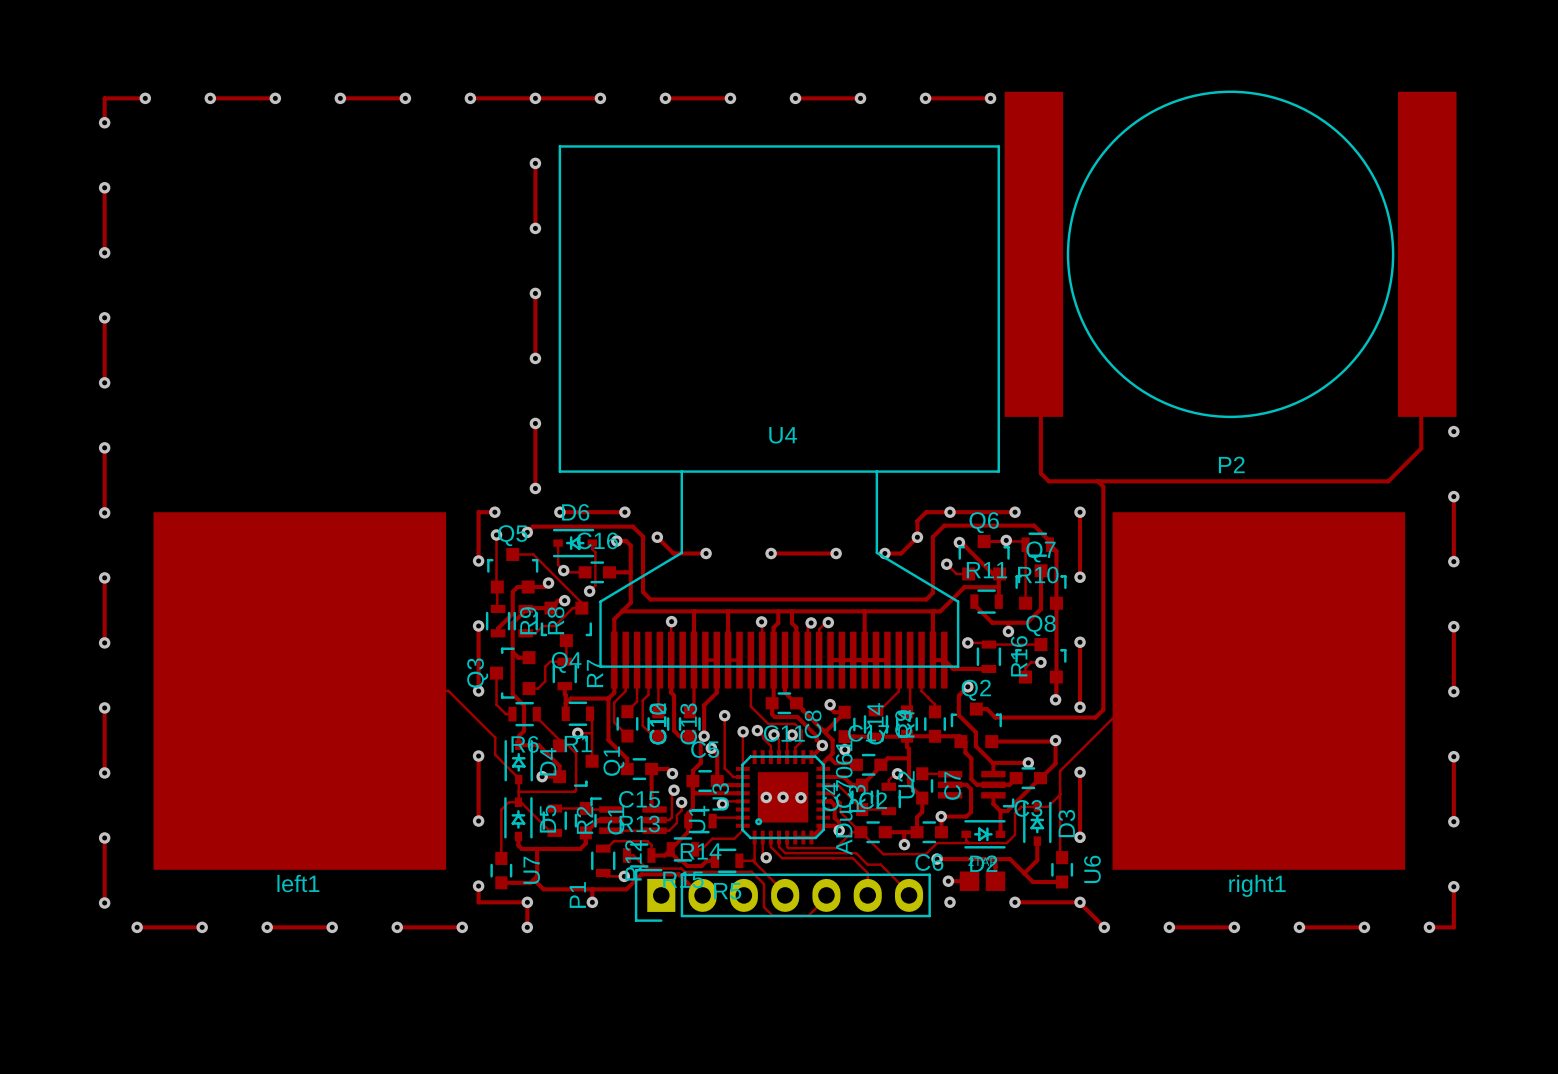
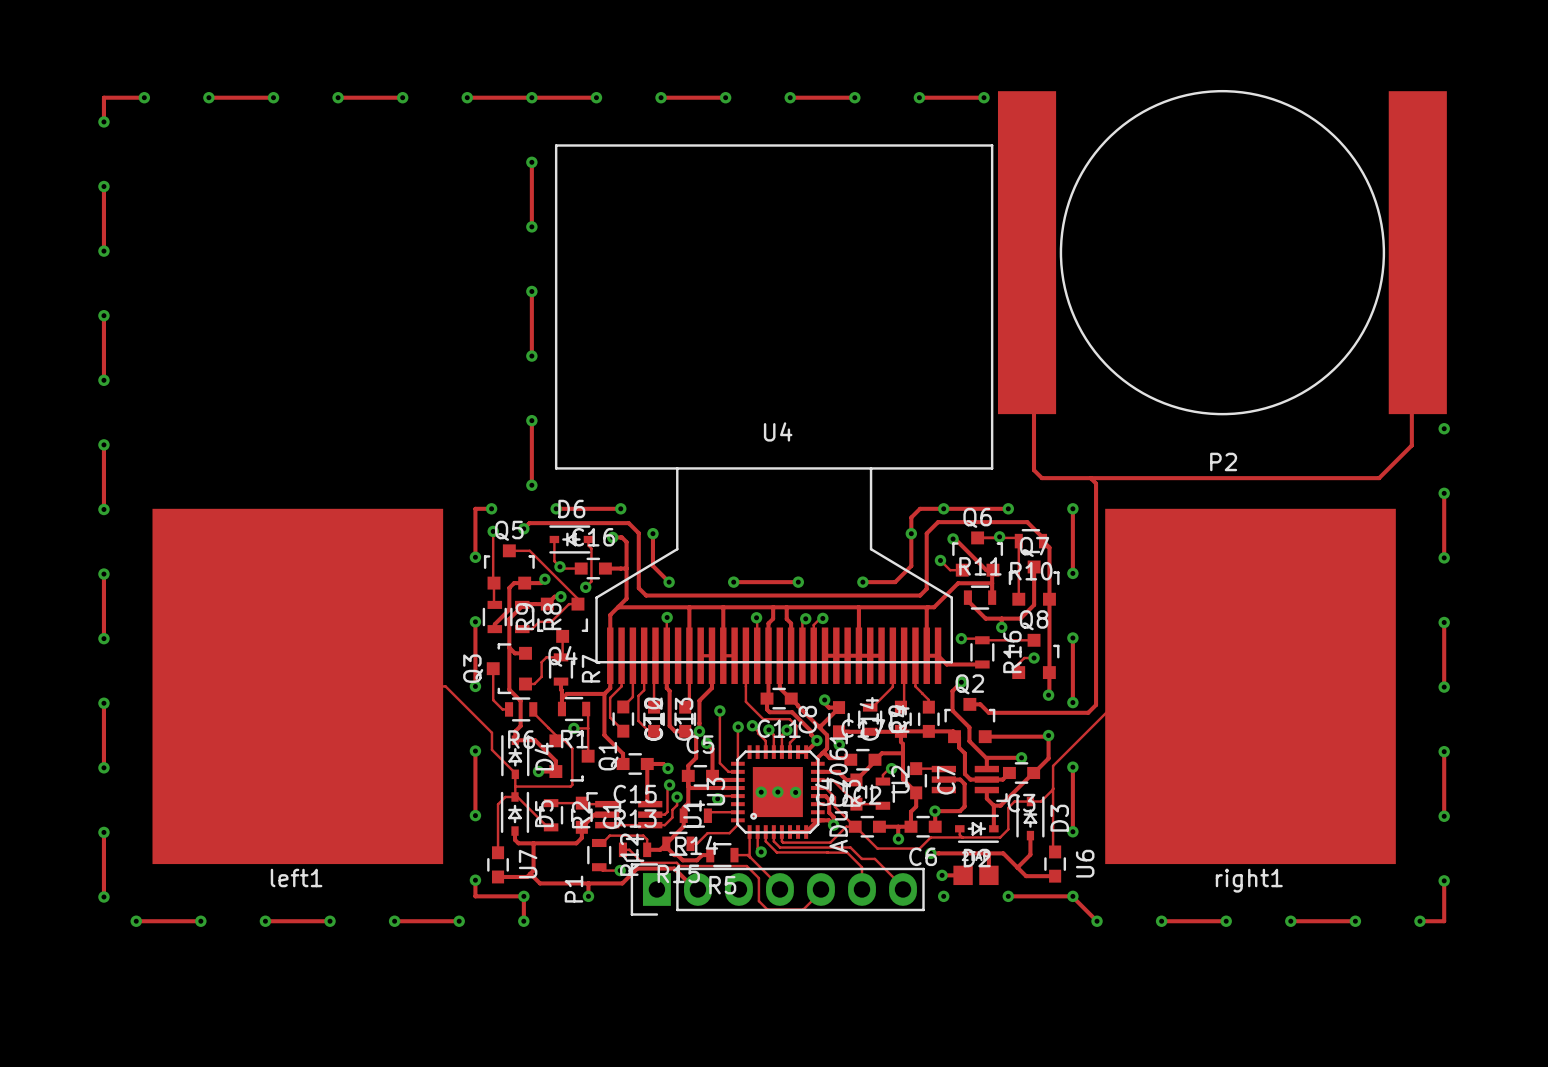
track: (657, 537) (673, 553) (706, 553) -> (652, 533) (652, 565) (669, 582)
track: (917, 537) (901, 553) (884, 553) -> (911, 533) (911, 565) (895, 582) (862, 582)
via: (706, 553) -> none
track: (771, 553) (836, 553) -> (733, 582) (798, 582)
via: (771, 553) -> none
via: (836, 553) -> none
via: (884, 553) -> none
via: none -> (669, 582)
via: none -> (733, 582)
via: none -> (798, 582)
via: none -> (862, 582)

